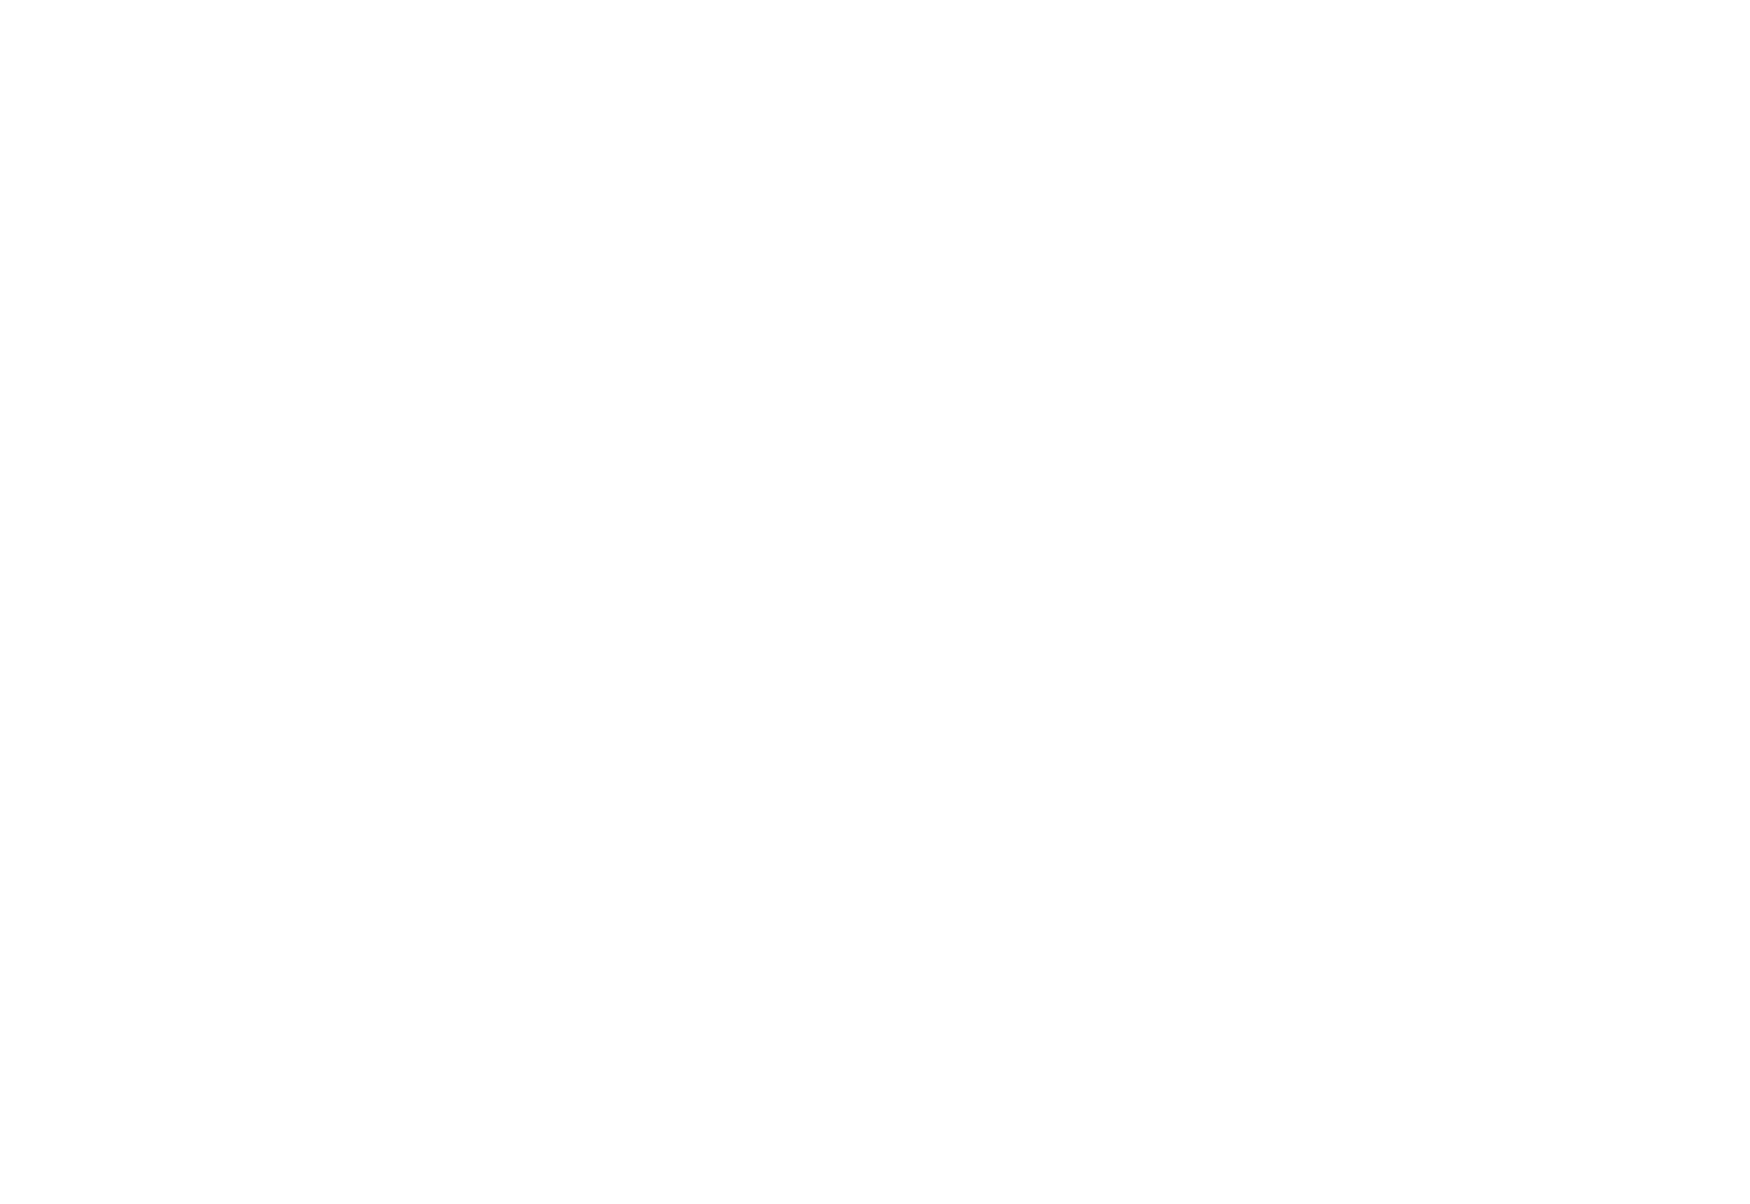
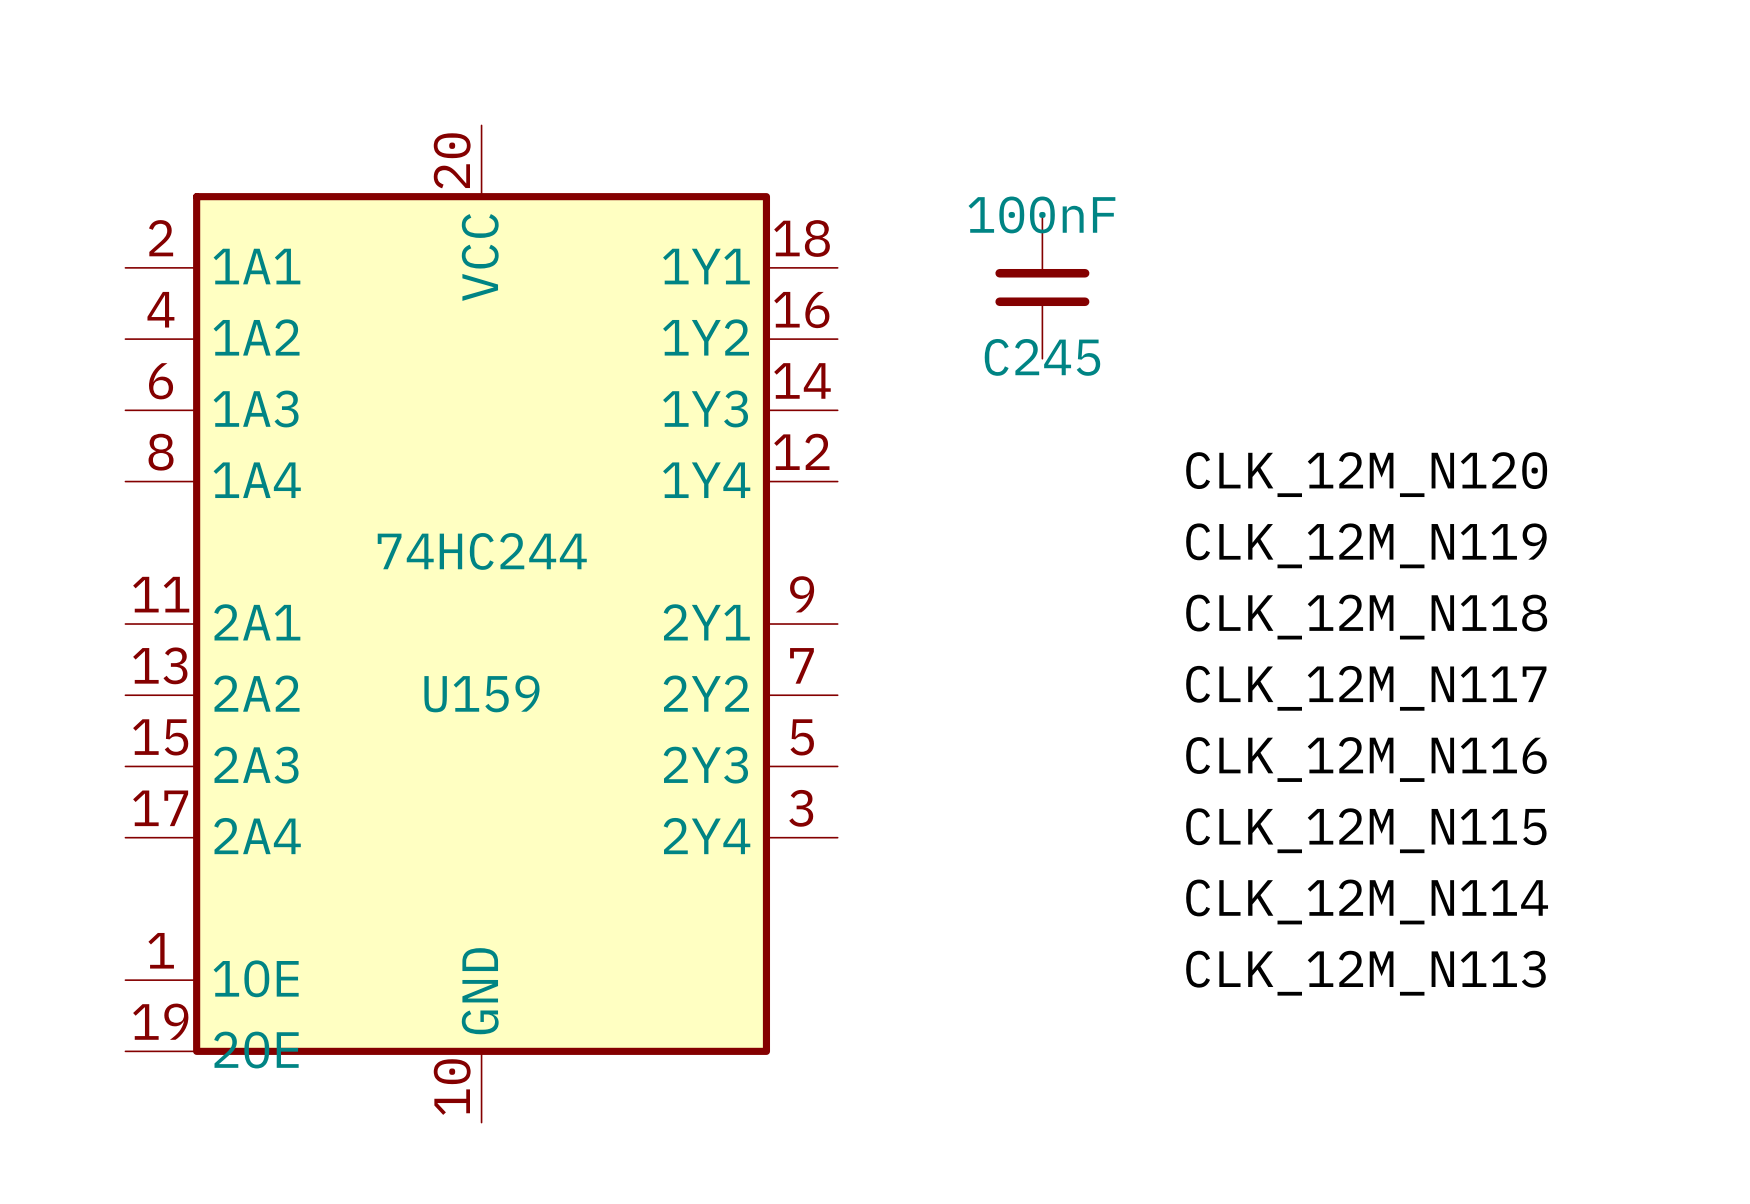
C245: none -> 100nF (1042, 287)
label: none -> CLK_12M_N120 (1366, 474)
label: none -> CLK_12M_N119 (1366, 545)
label: none -> CLK_12M_N118 (1366, 617)
U159: none -> 74HC244 (481, 624)
label: none -> CLK_12M_N117 (1366, 688)
label: none -> CLK_12M_N116 (1366, 759)
label: none -> CLK_12M_N115 (1366, 830)
label: none -> CLK_12M_N114 (1367, 901)
label: none -> CLK_12M_N113 (1365, 973)

